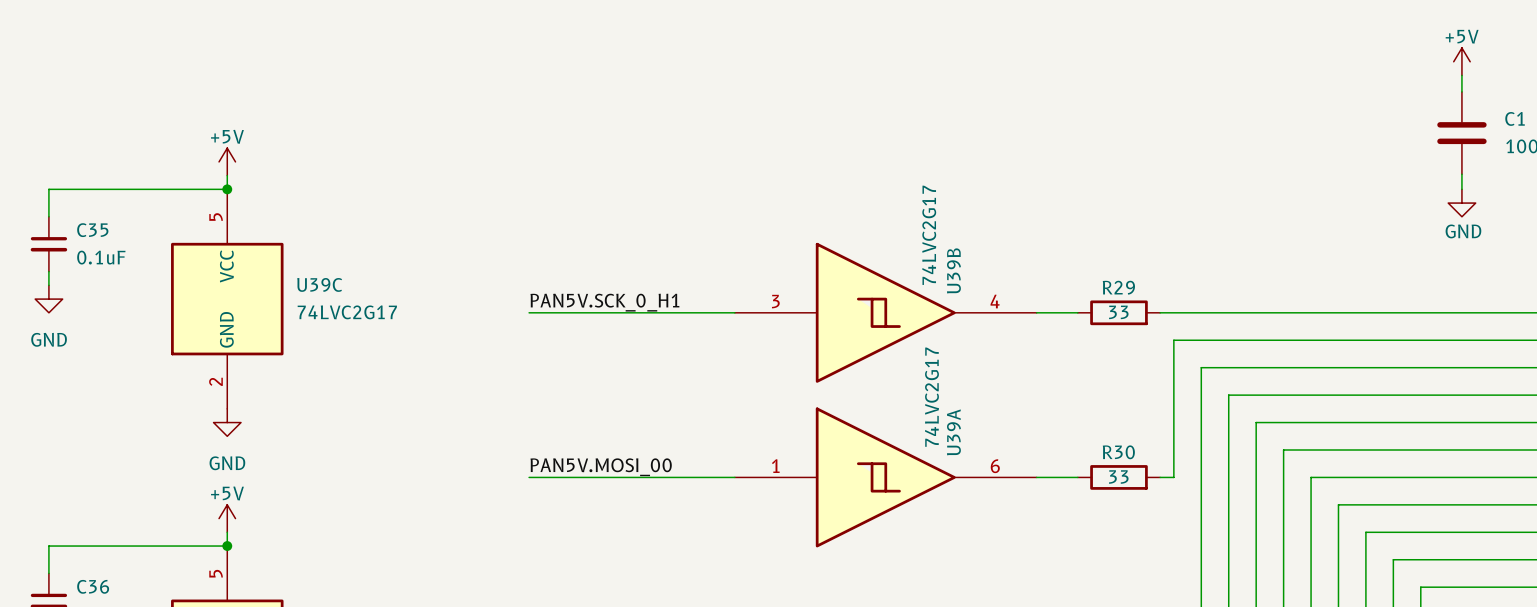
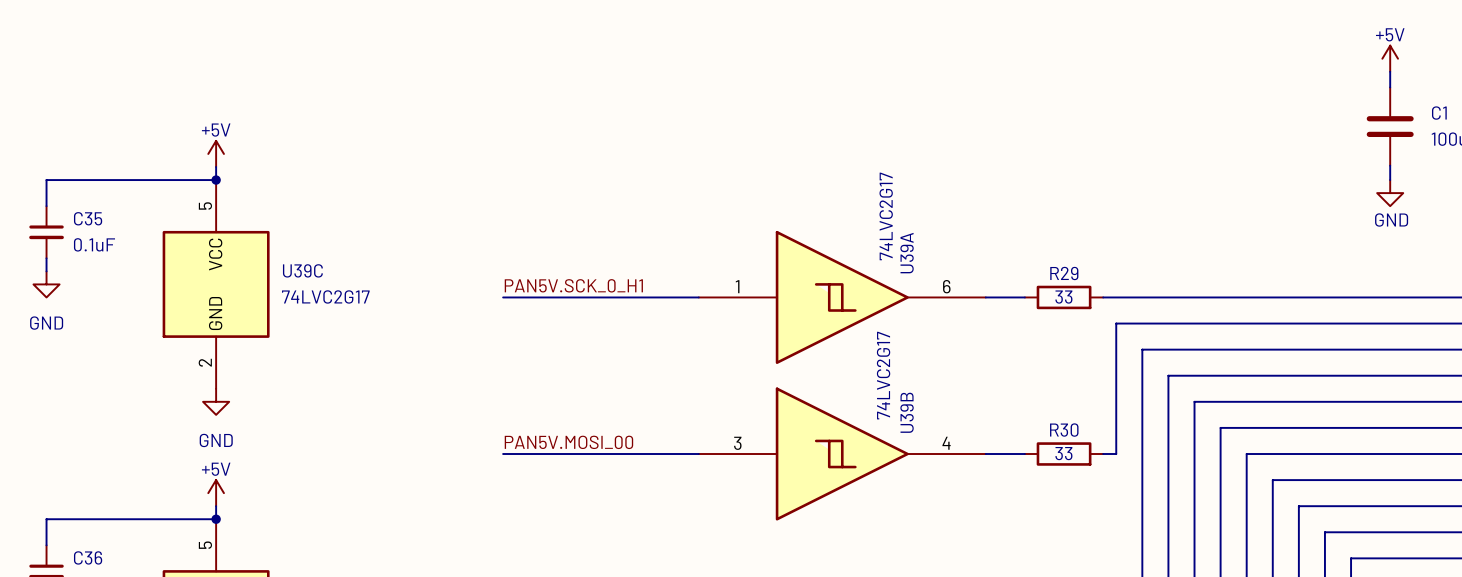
U39B position: (885, 312) -> (842, 454)
U39A position: (885, 477) -> (842, 297)

